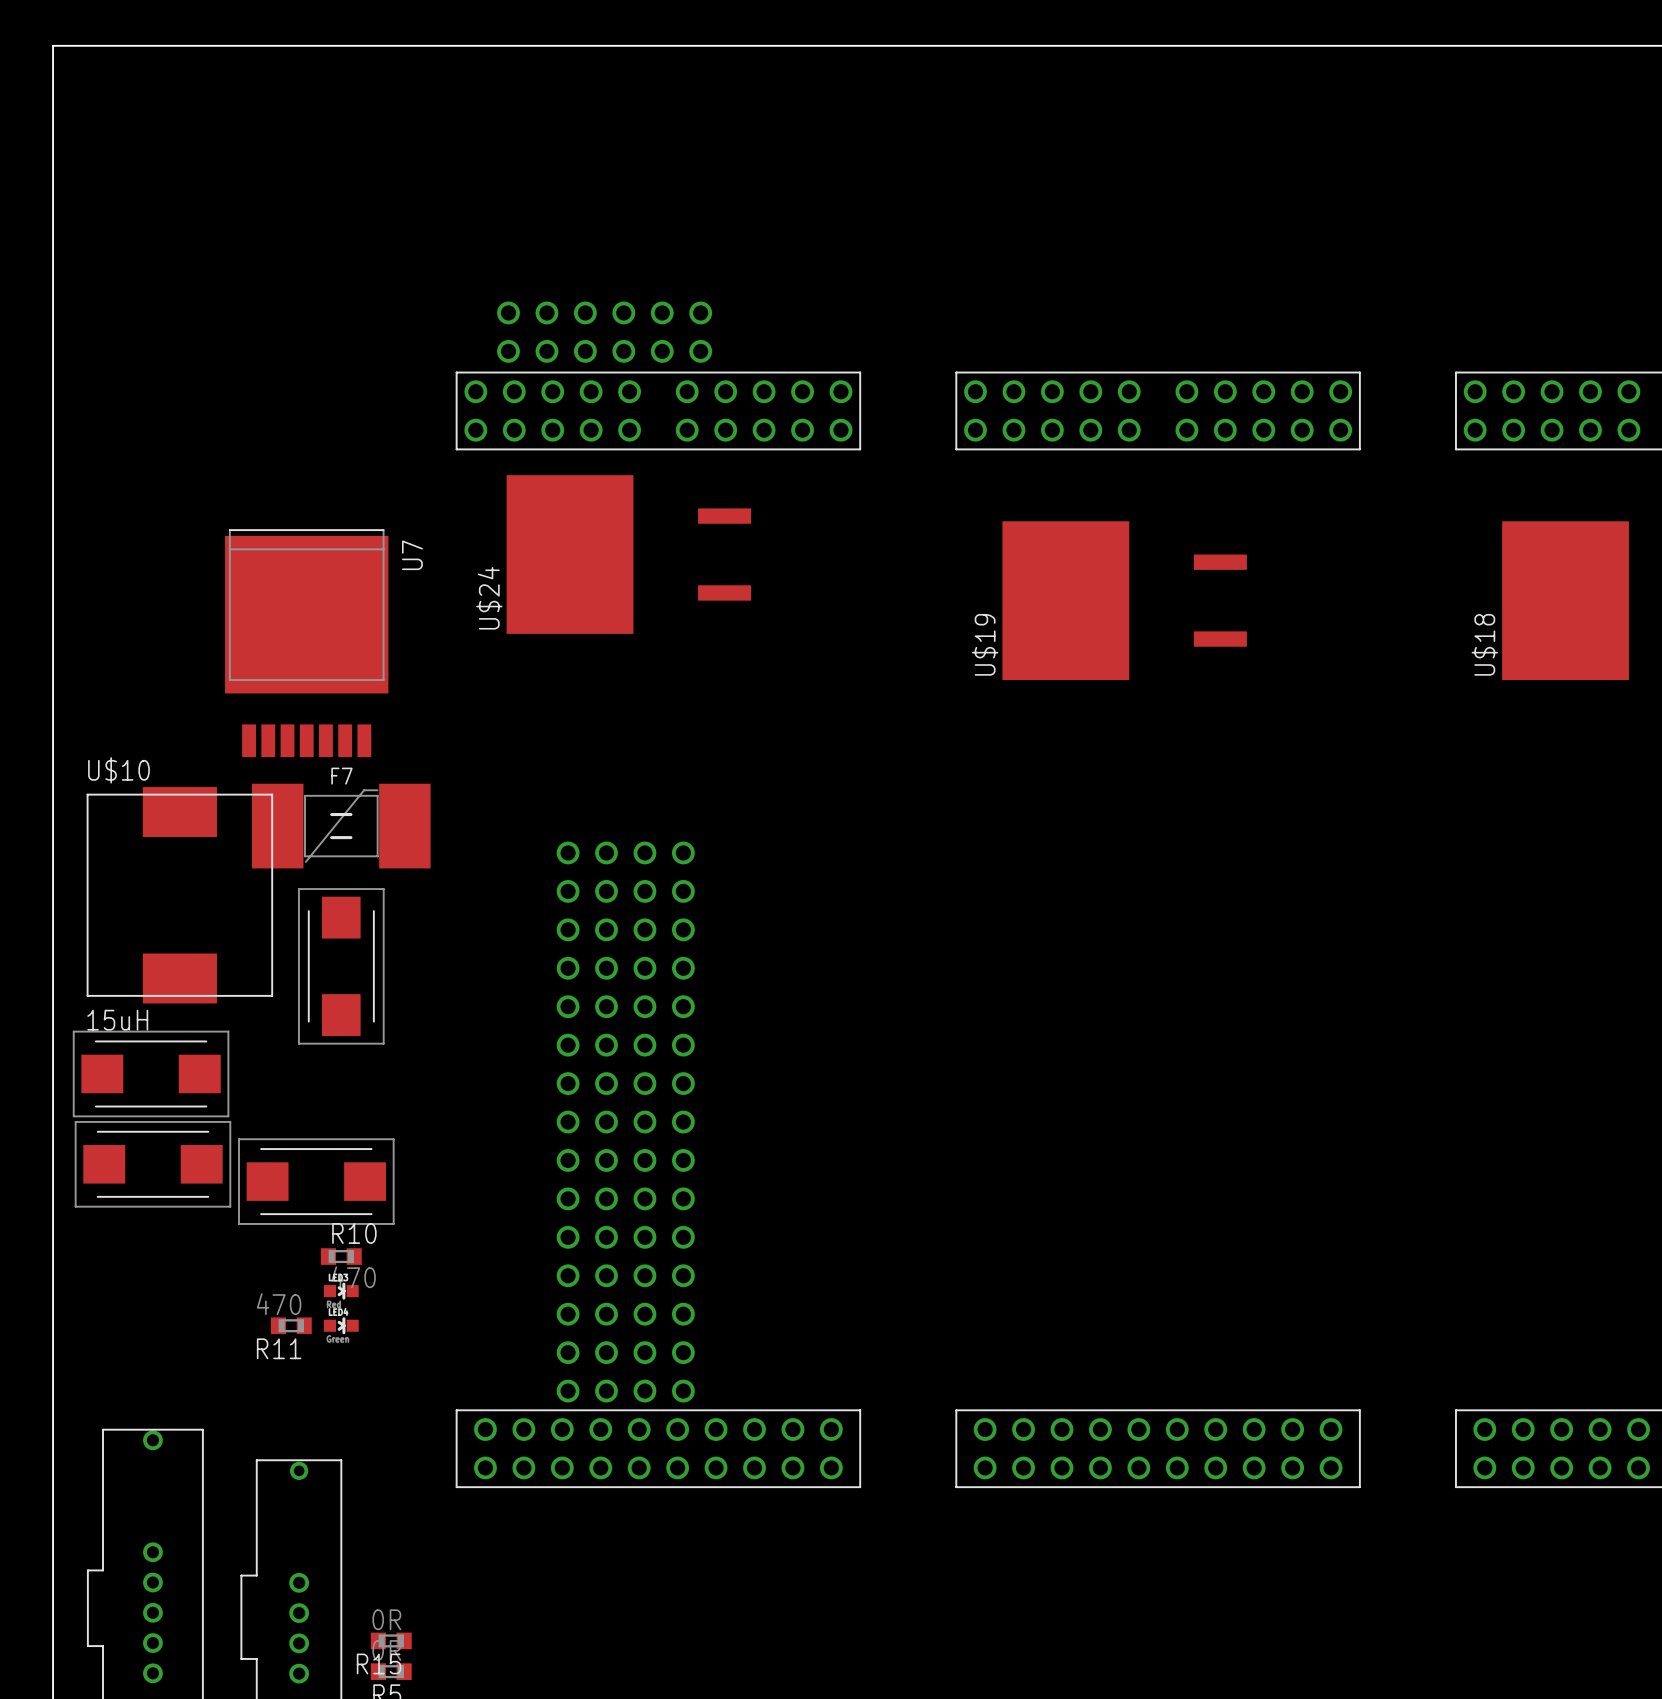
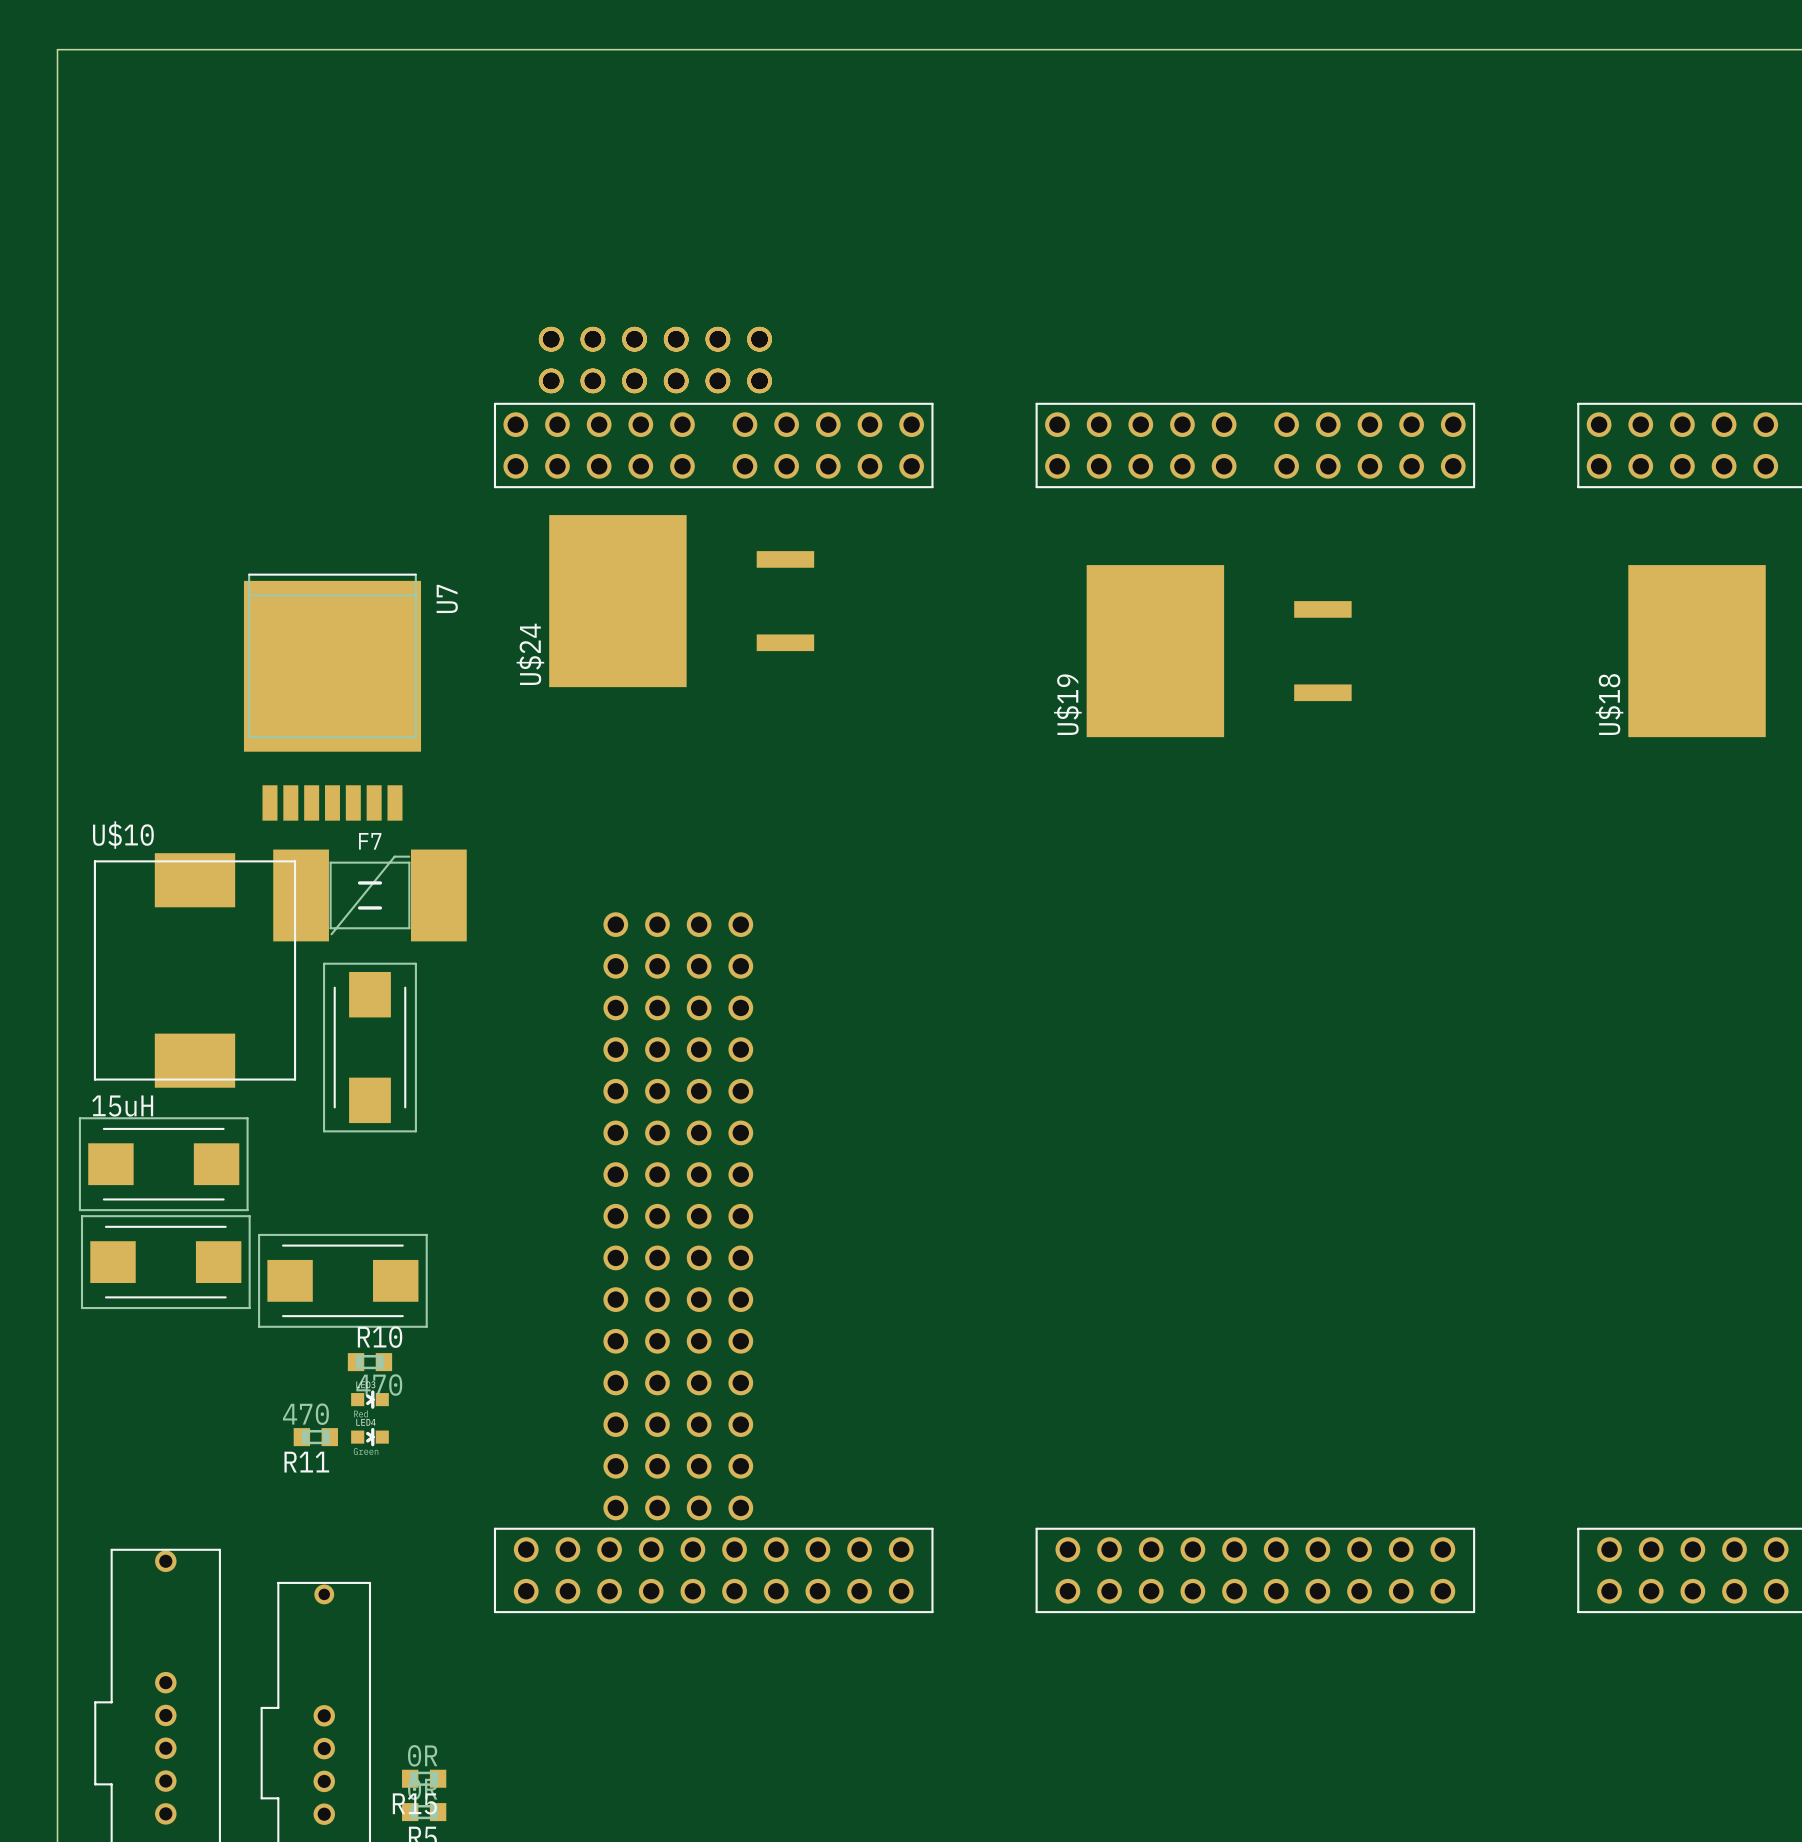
part: none -> (655, 360)

